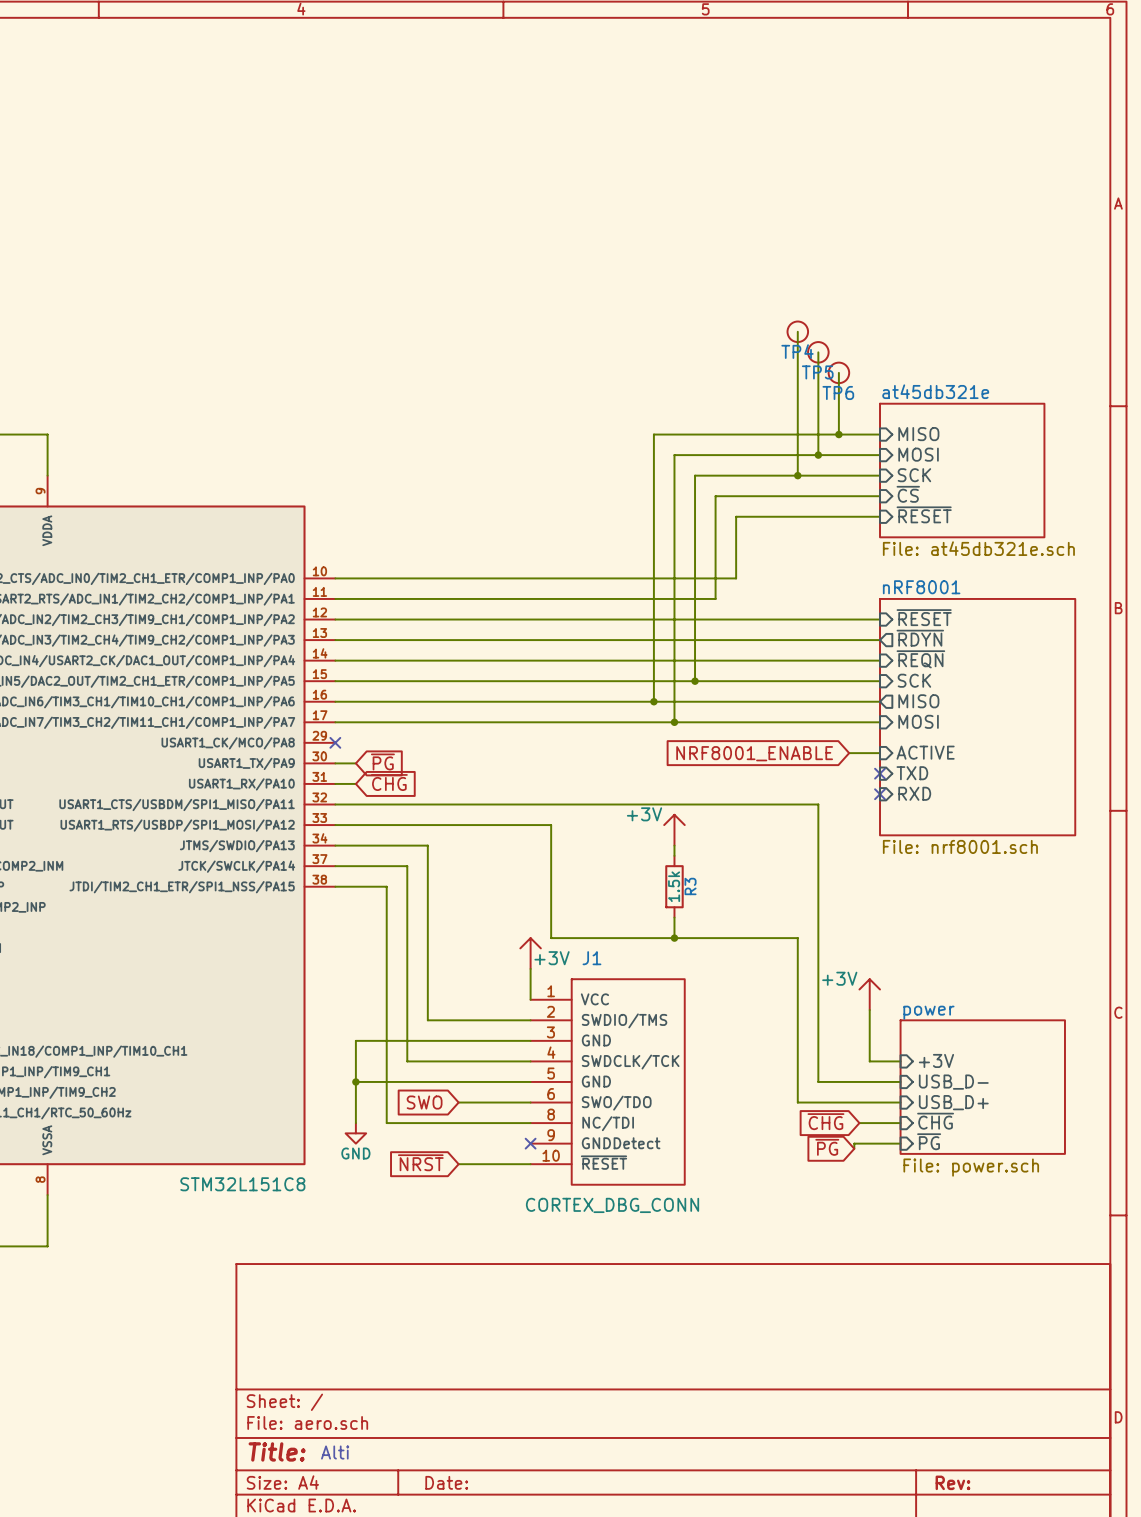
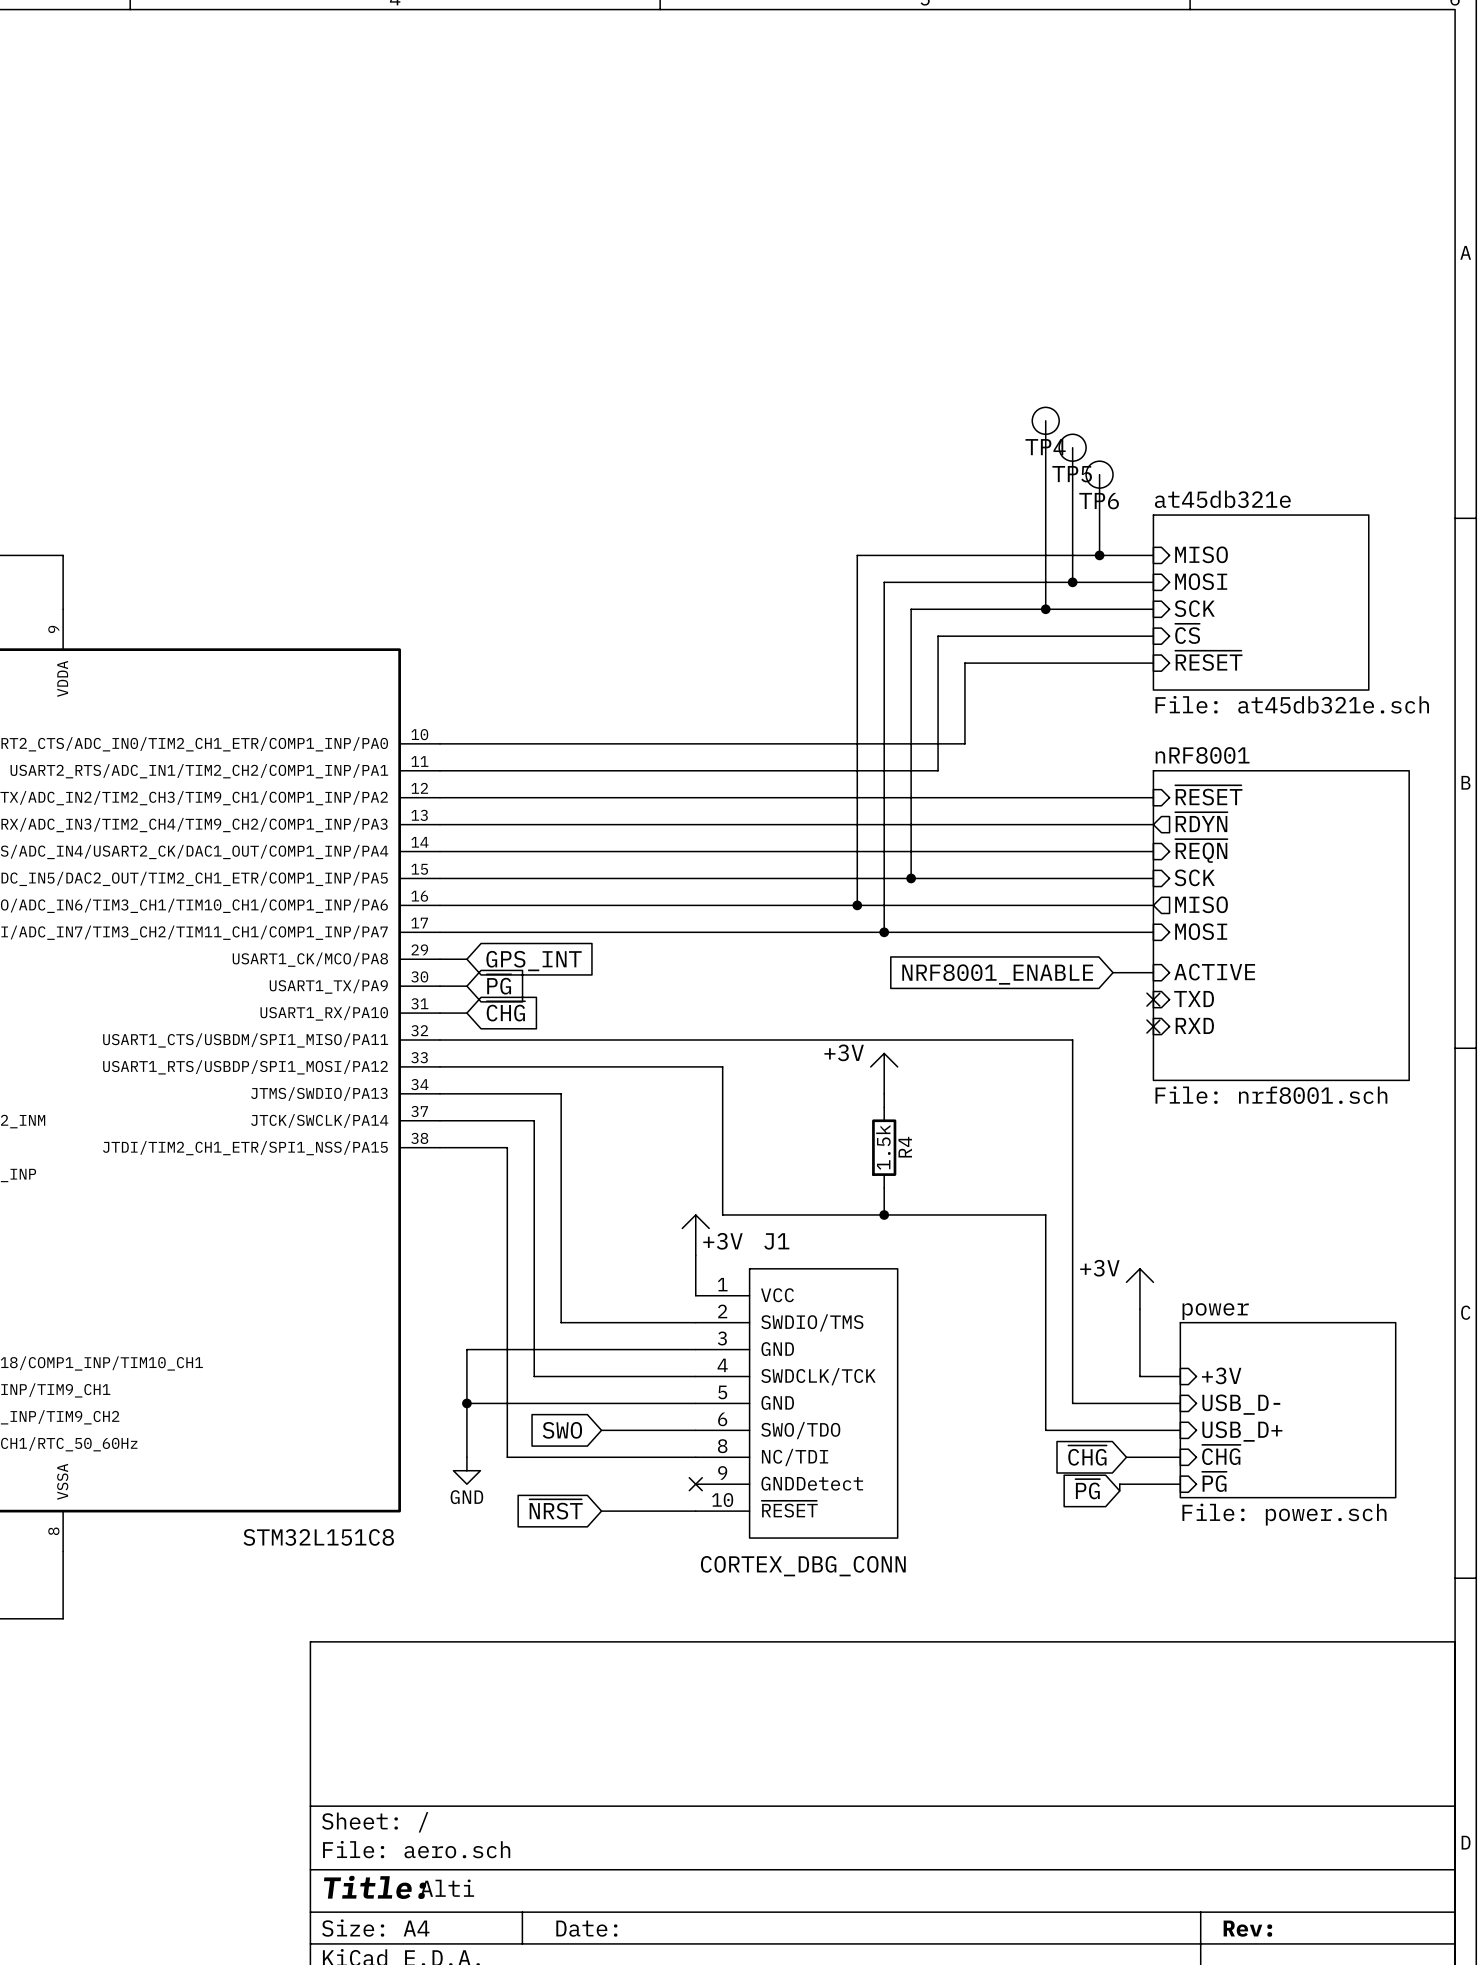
wire: none -> (440, 959) (466, 959)
no-connect mark: (335, 742) -> none
global label: none -> GPS_INT (534, 961)
R3 name: R3 (690, 886) -> R4 (905, 1147)

